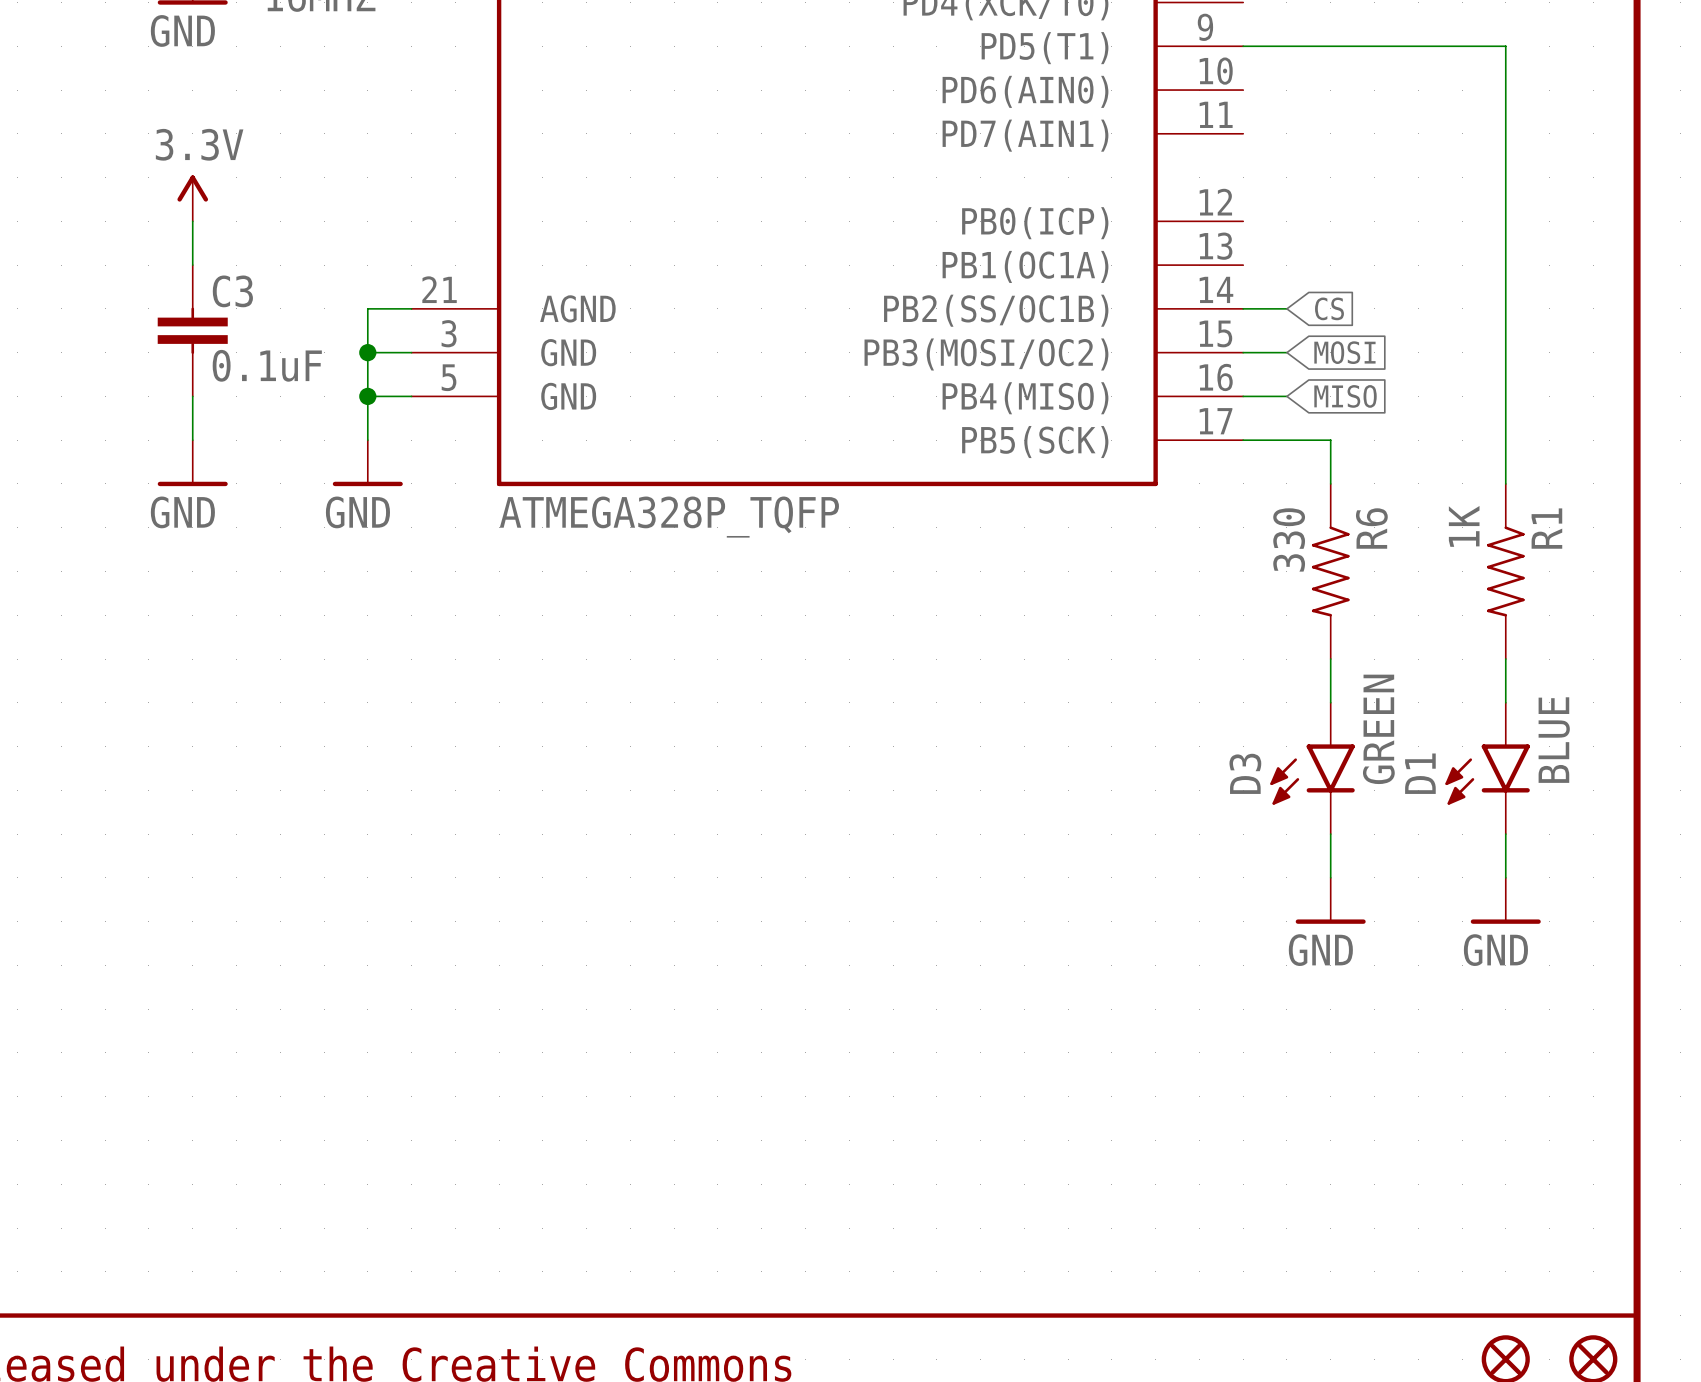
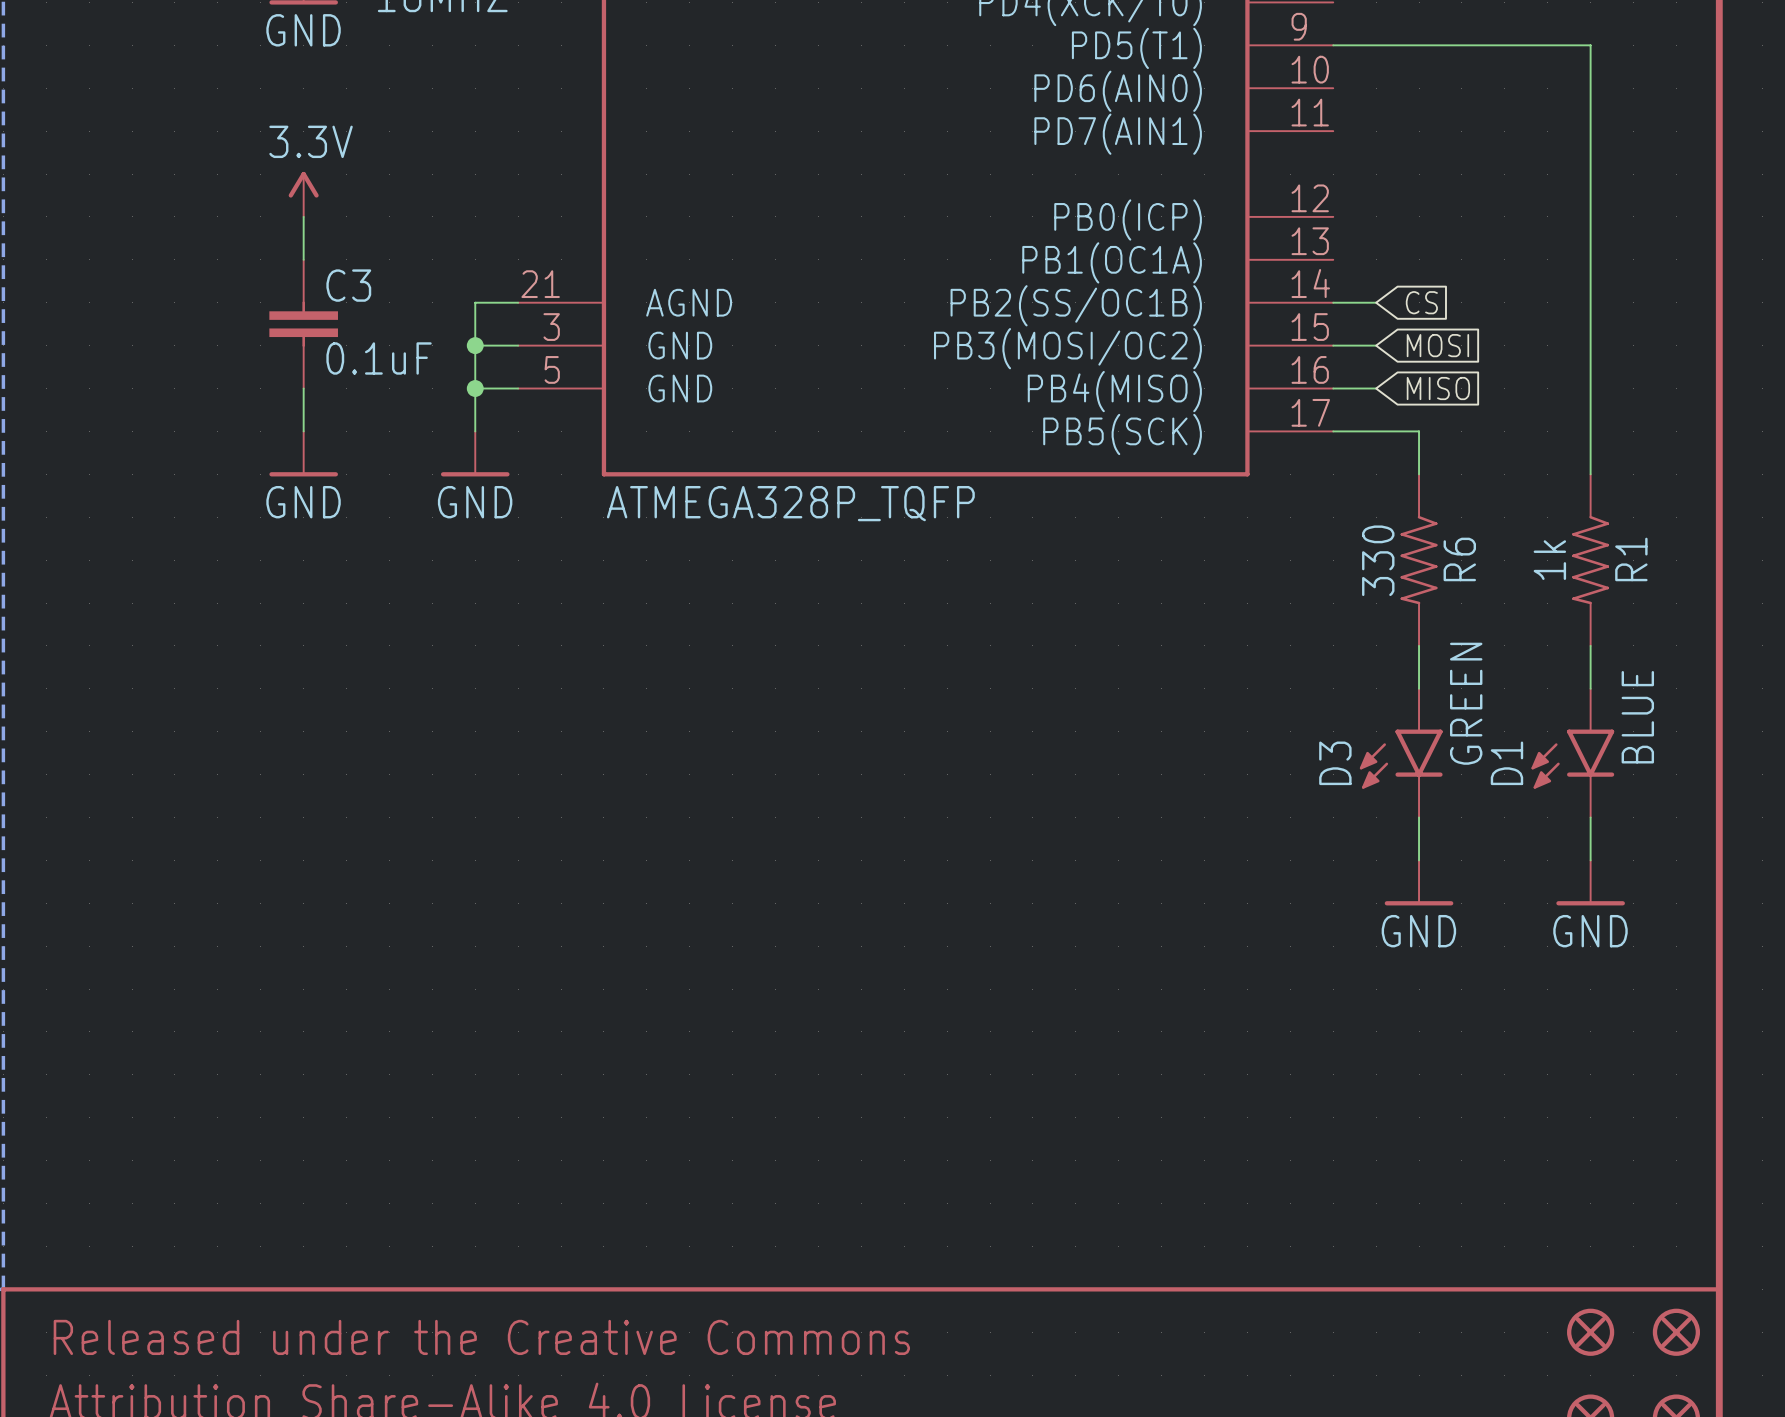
R1 value: 1K (1464, 526) -> 1k (1549, 560)
R6 name position: R6 (1371, 528) -> R6 (1459, 559)
R1 name position: R1 (1546, 528) -> R1 (1631, 559)
R6 value position: 330 (1289, 539) -> 330 (1378, 560)

